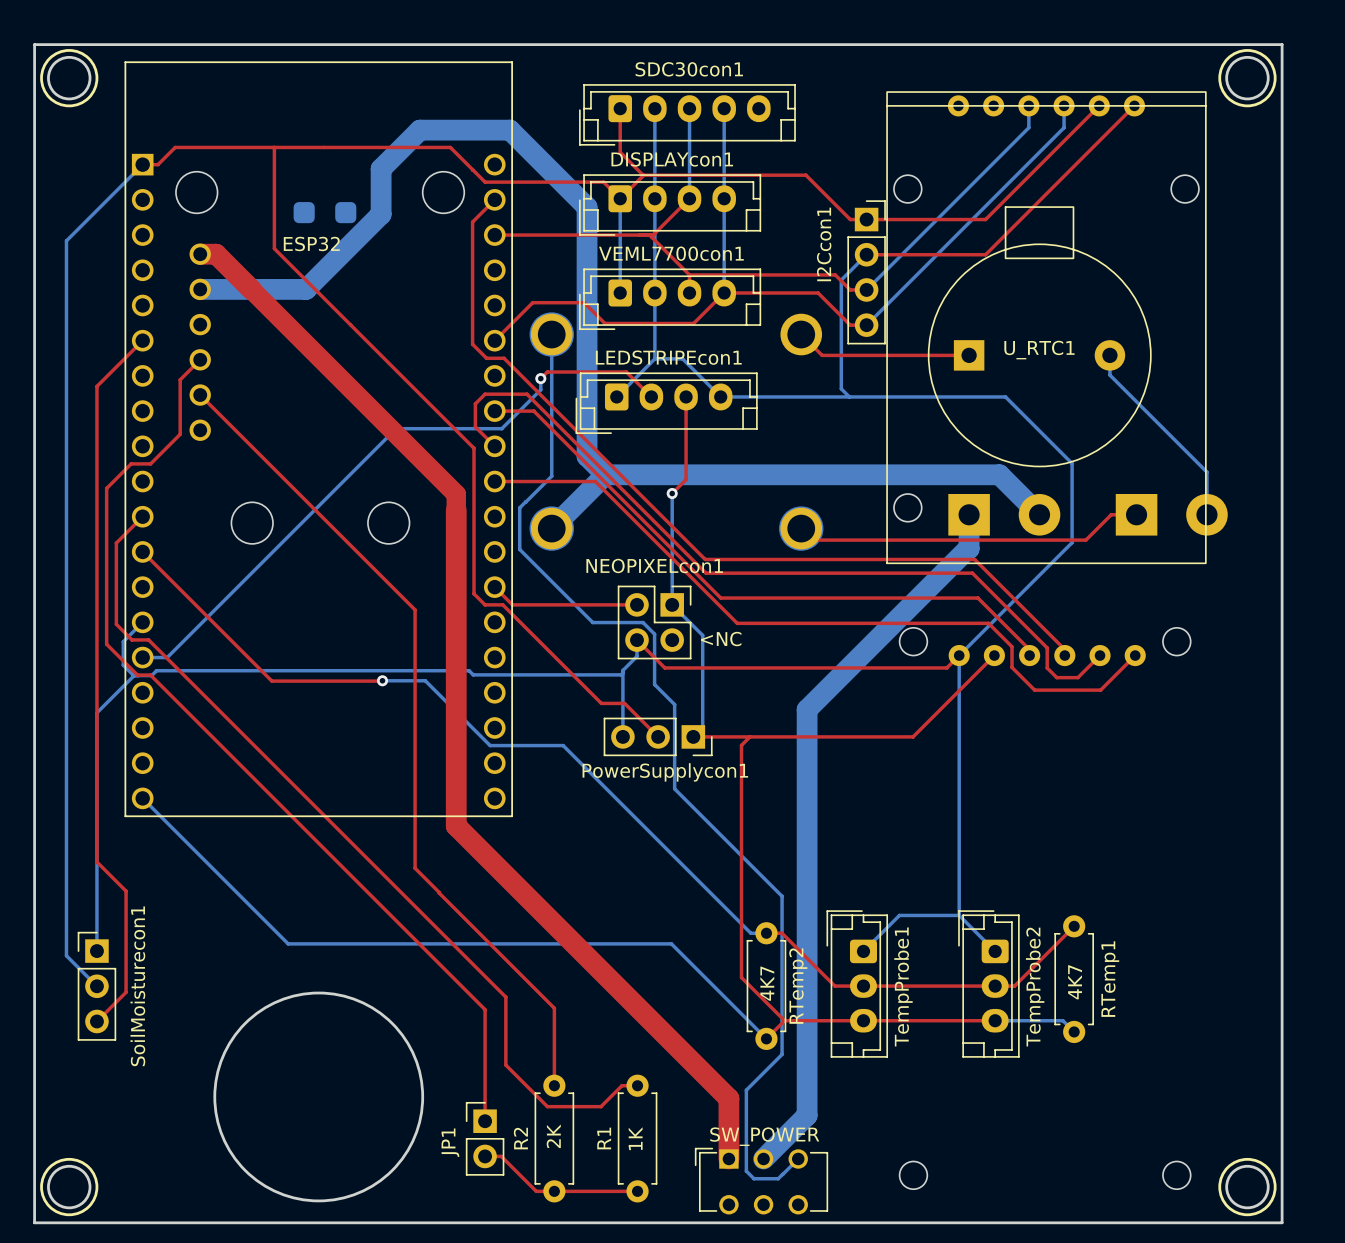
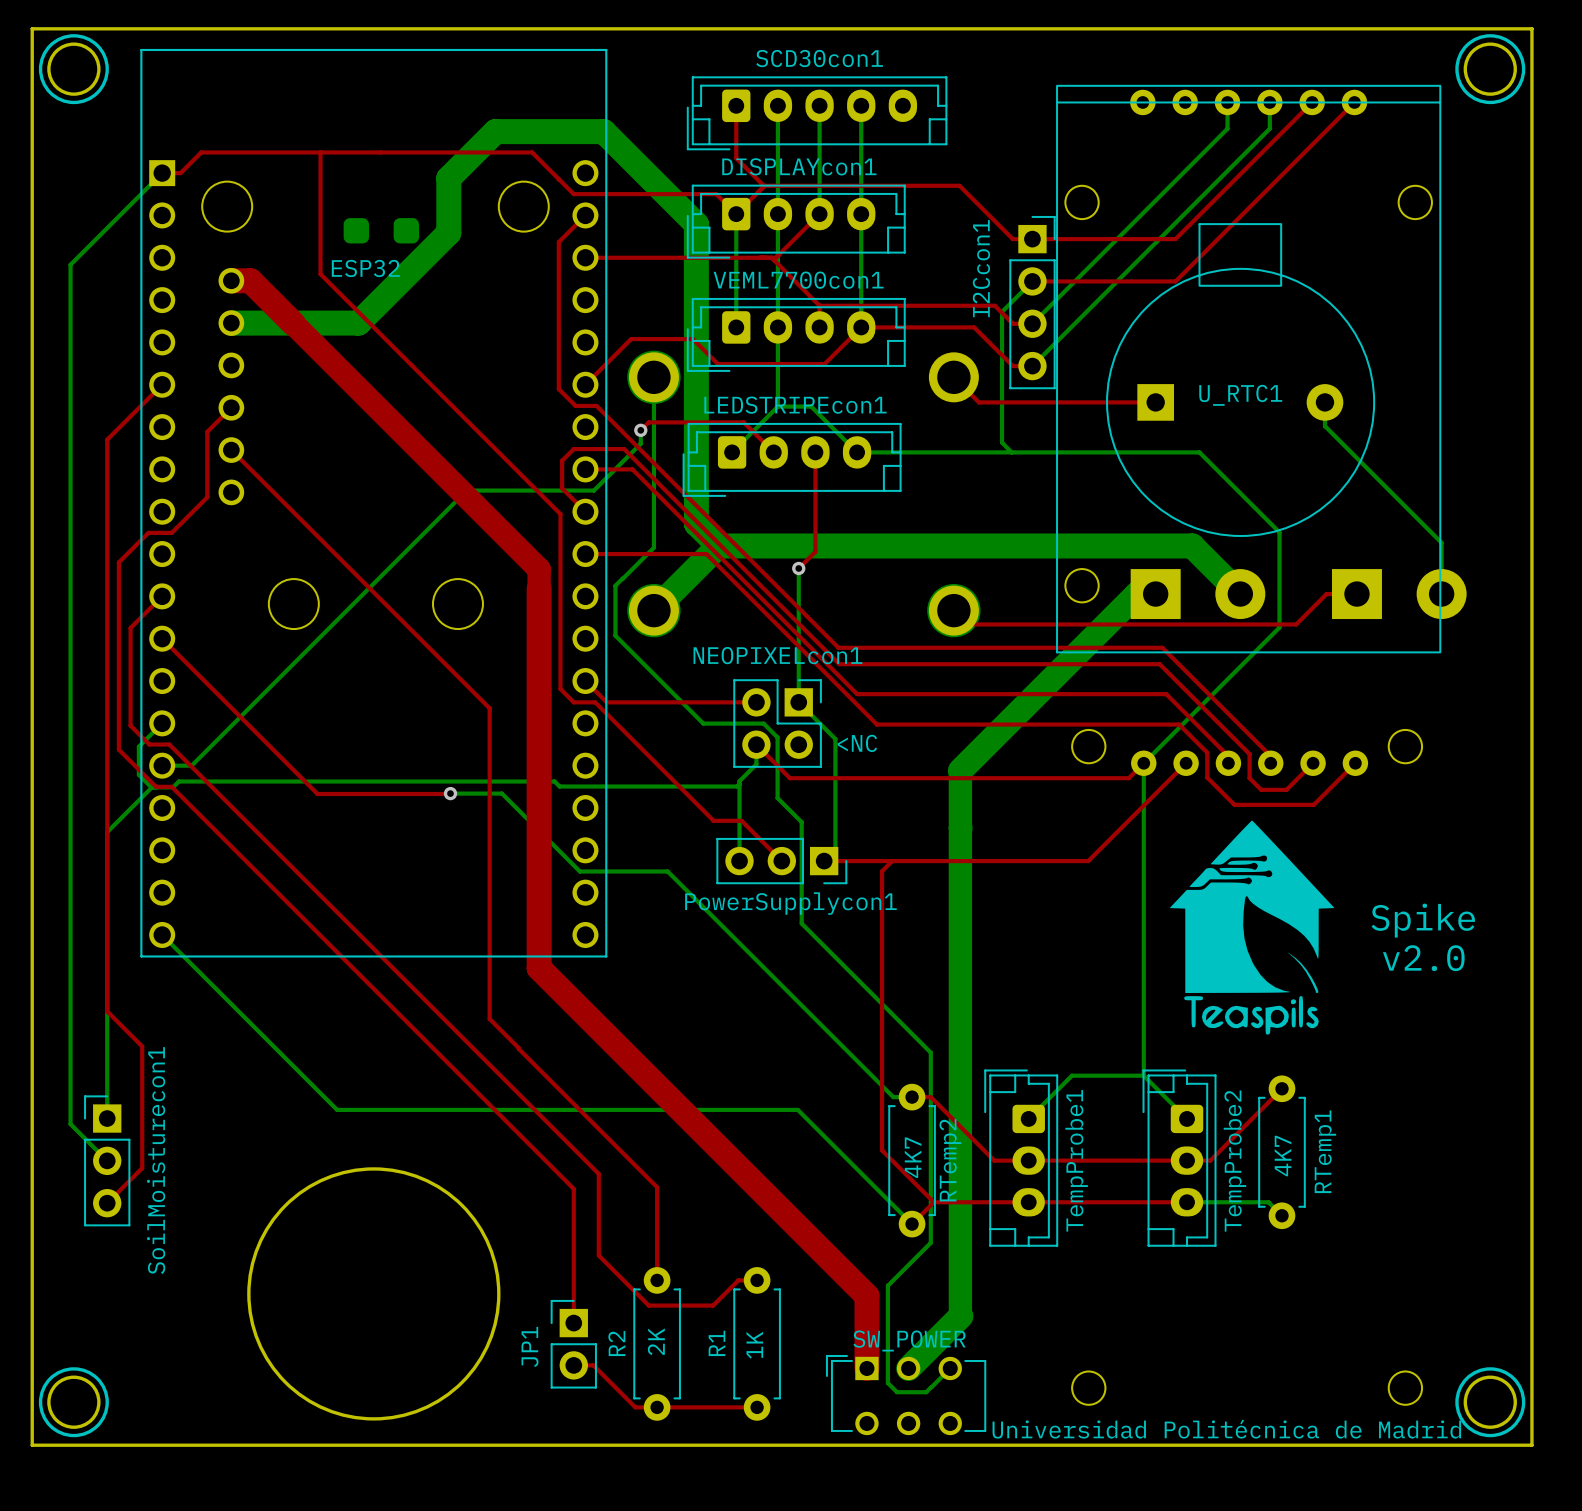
SDC30con1 name: SDC30con1 (689, 69) -> SCD30con1 (819, 58)
bottom track: (969, 514) (969, 548) (807, 709) (807, 1115) -> (960, 828) (960, 1316)
bottom track: none -> (1155, 594) (1137, 594) (960, 770) (960, 828)
drawing: none -> [1169, 820, 1335, 1035]
text: none -> Spike (1423, 920)
text: none -> v2.0 (1423, 958)
text: none -> Universidad Politécnica de Madrid (1226, 1429)

